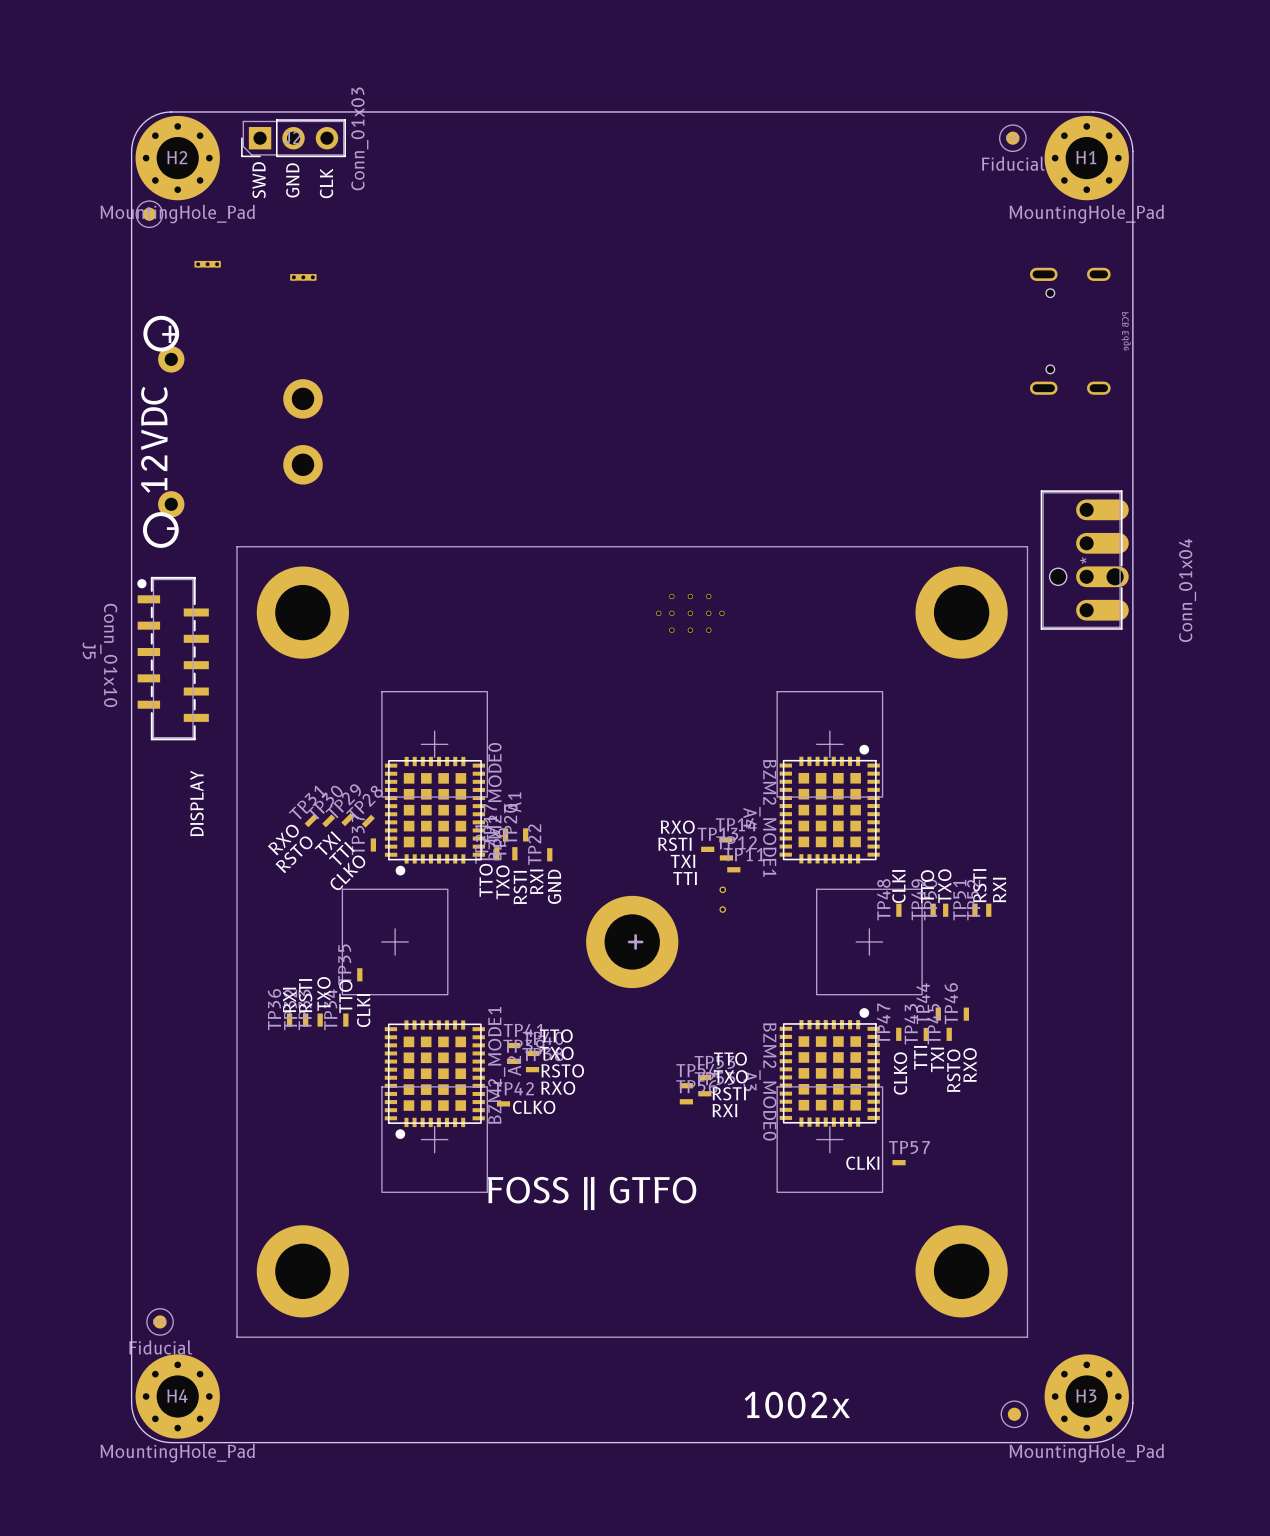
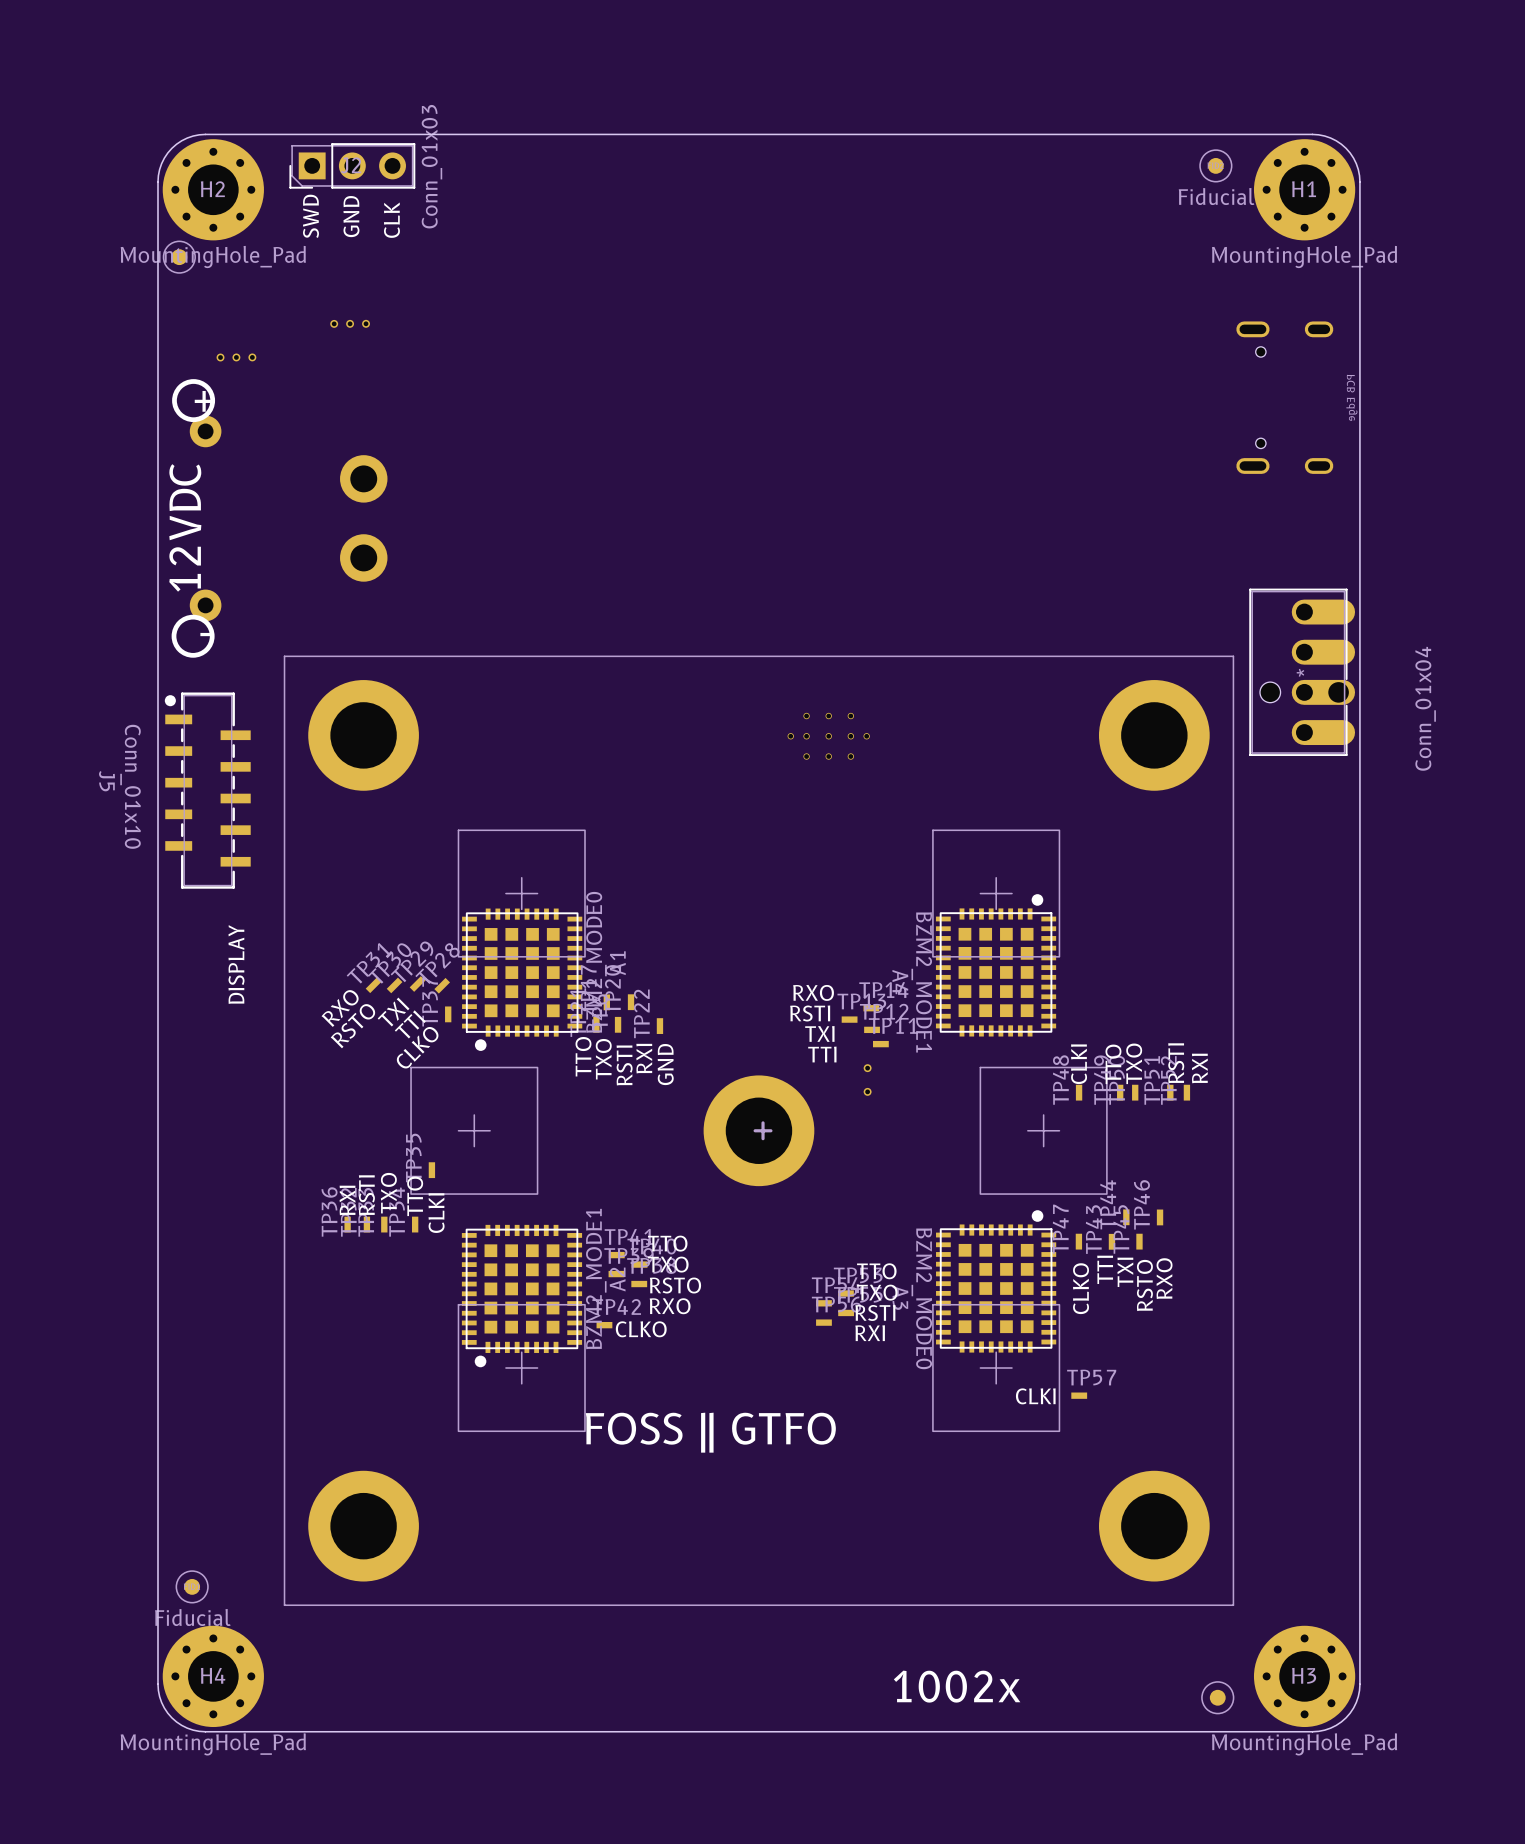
part: (207, 264) -> none
part: none -> (350, 323)
part: (303, 277) -> none
part: none -> (236, 357)

